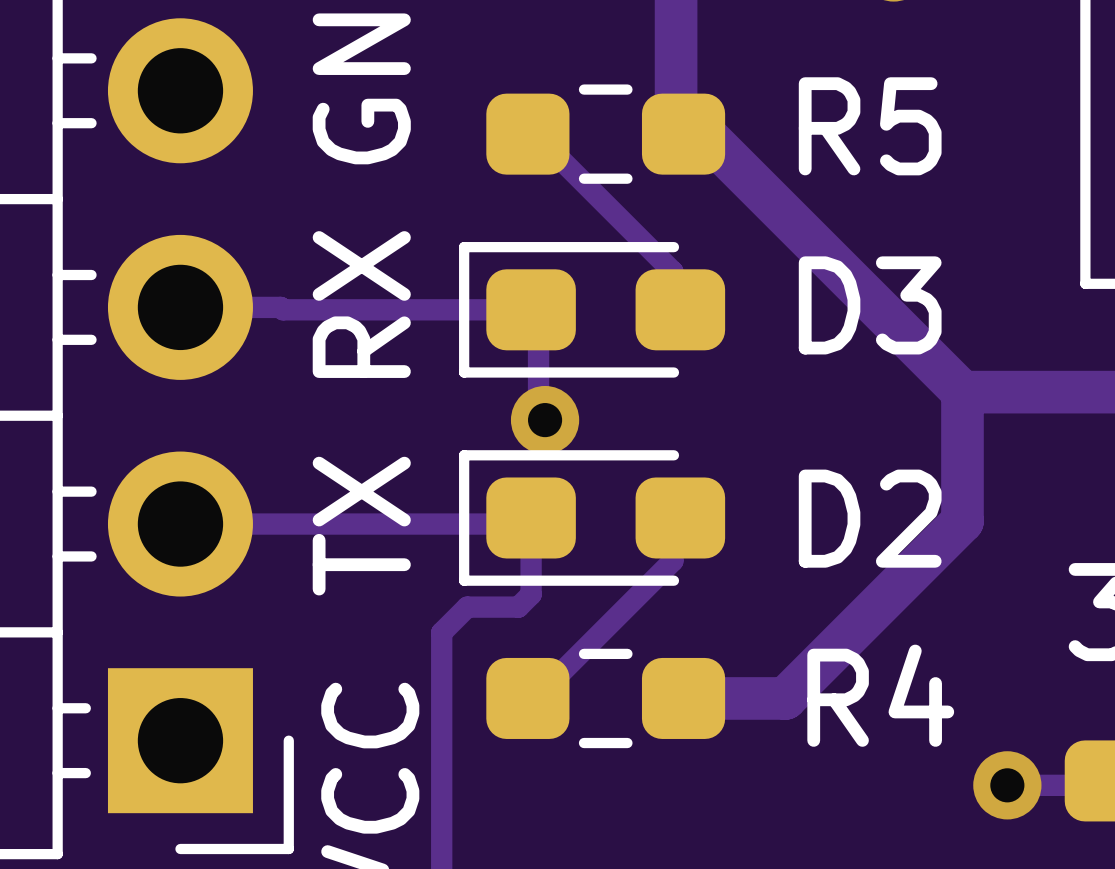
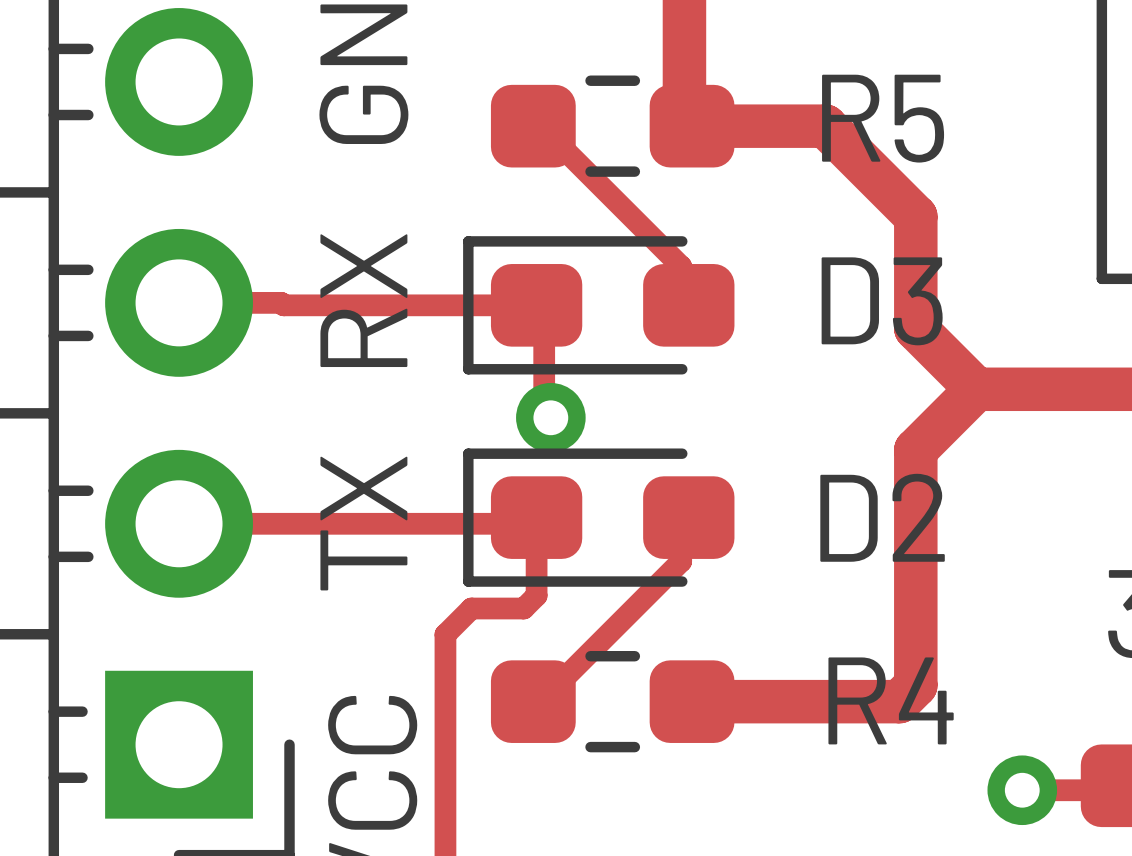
track: (704, 134) (962, 392) (962, 521) (785, 698) -> (713, 126) (825, 126) (915, 216) (915, 328) (976, 389) (915, 450) (915, 685) (899, 701) (795, 701)

